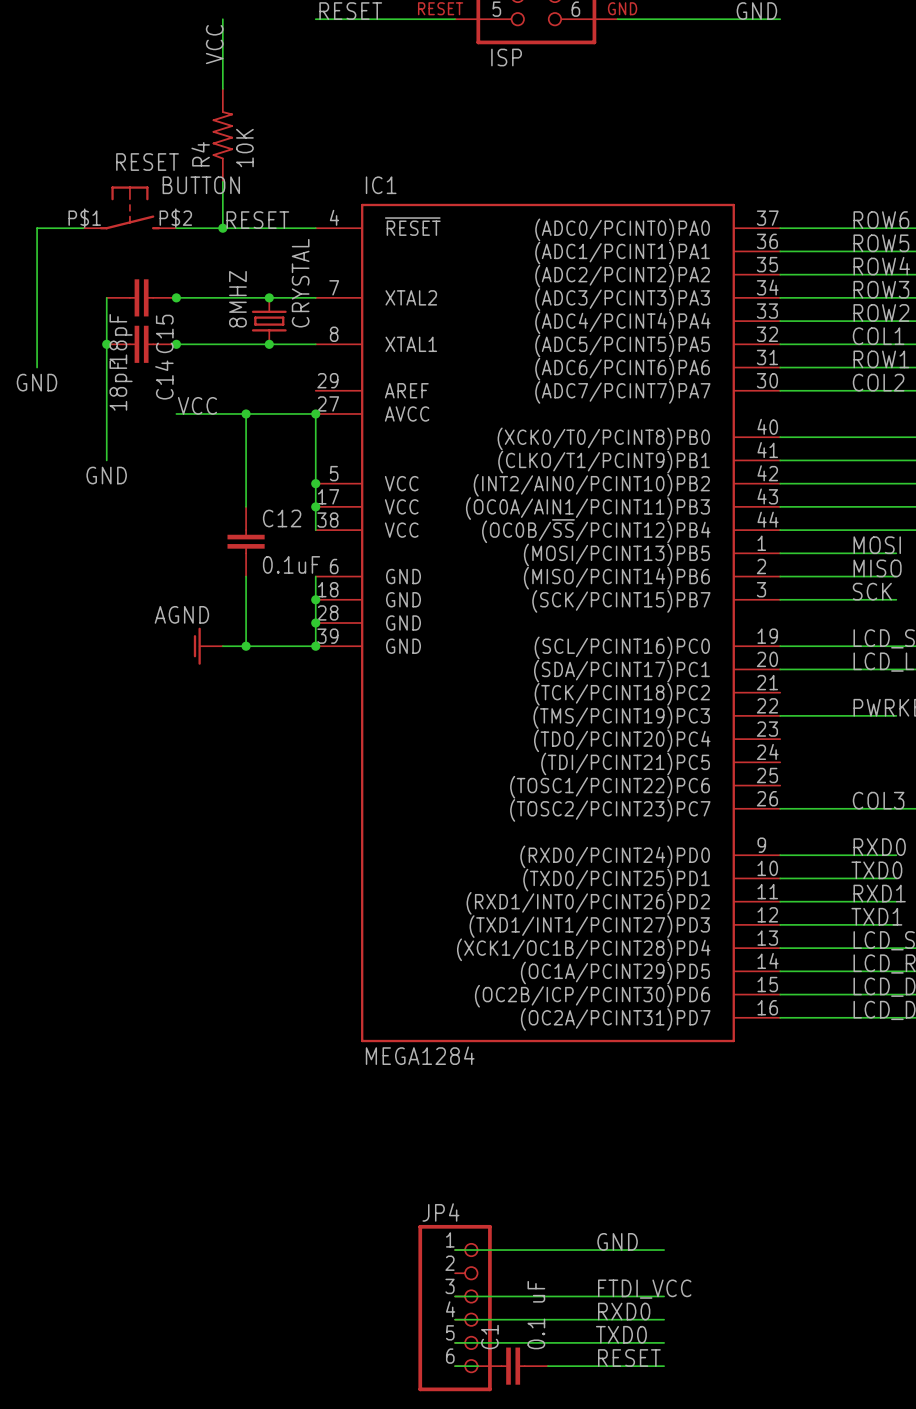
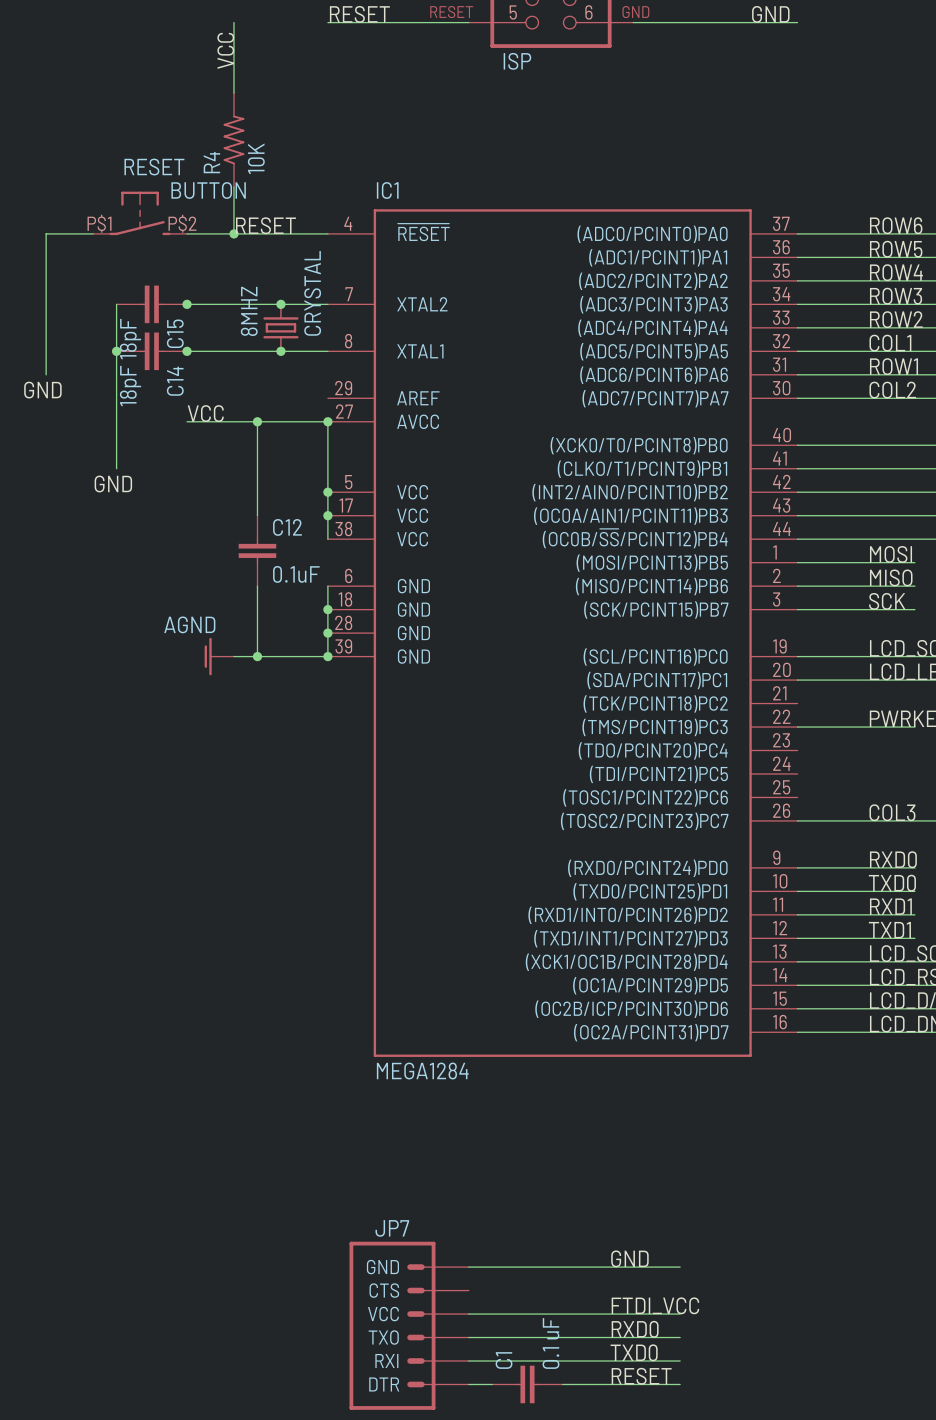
JP7: none -> (409, 1325)
JP4: (455, 1308) -> none

